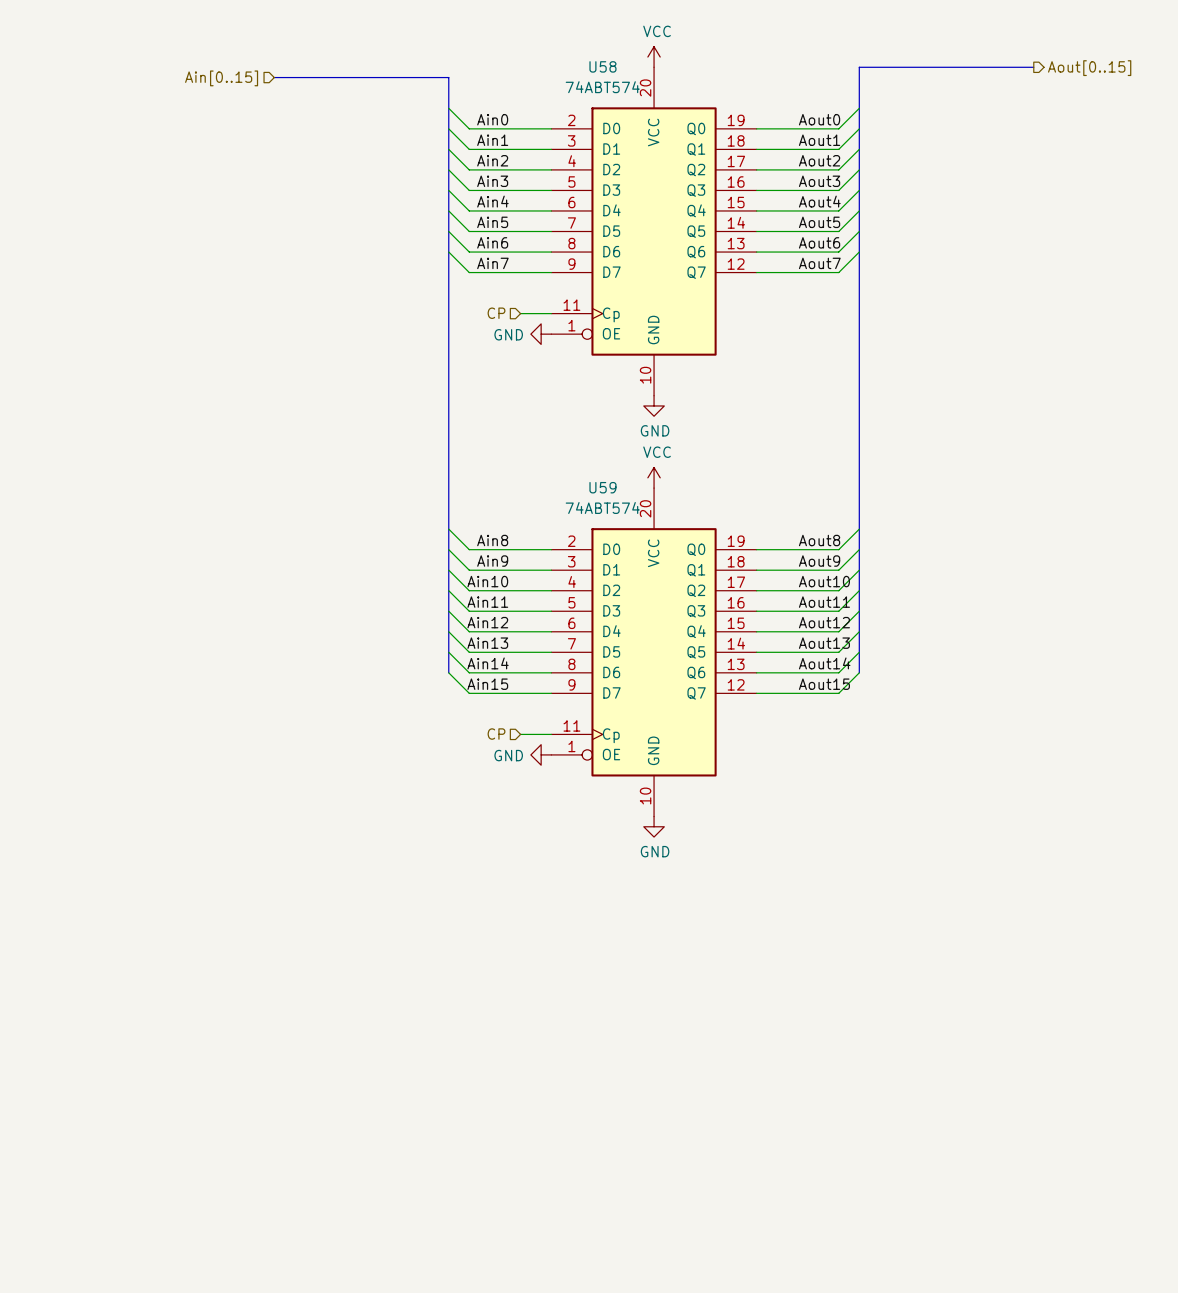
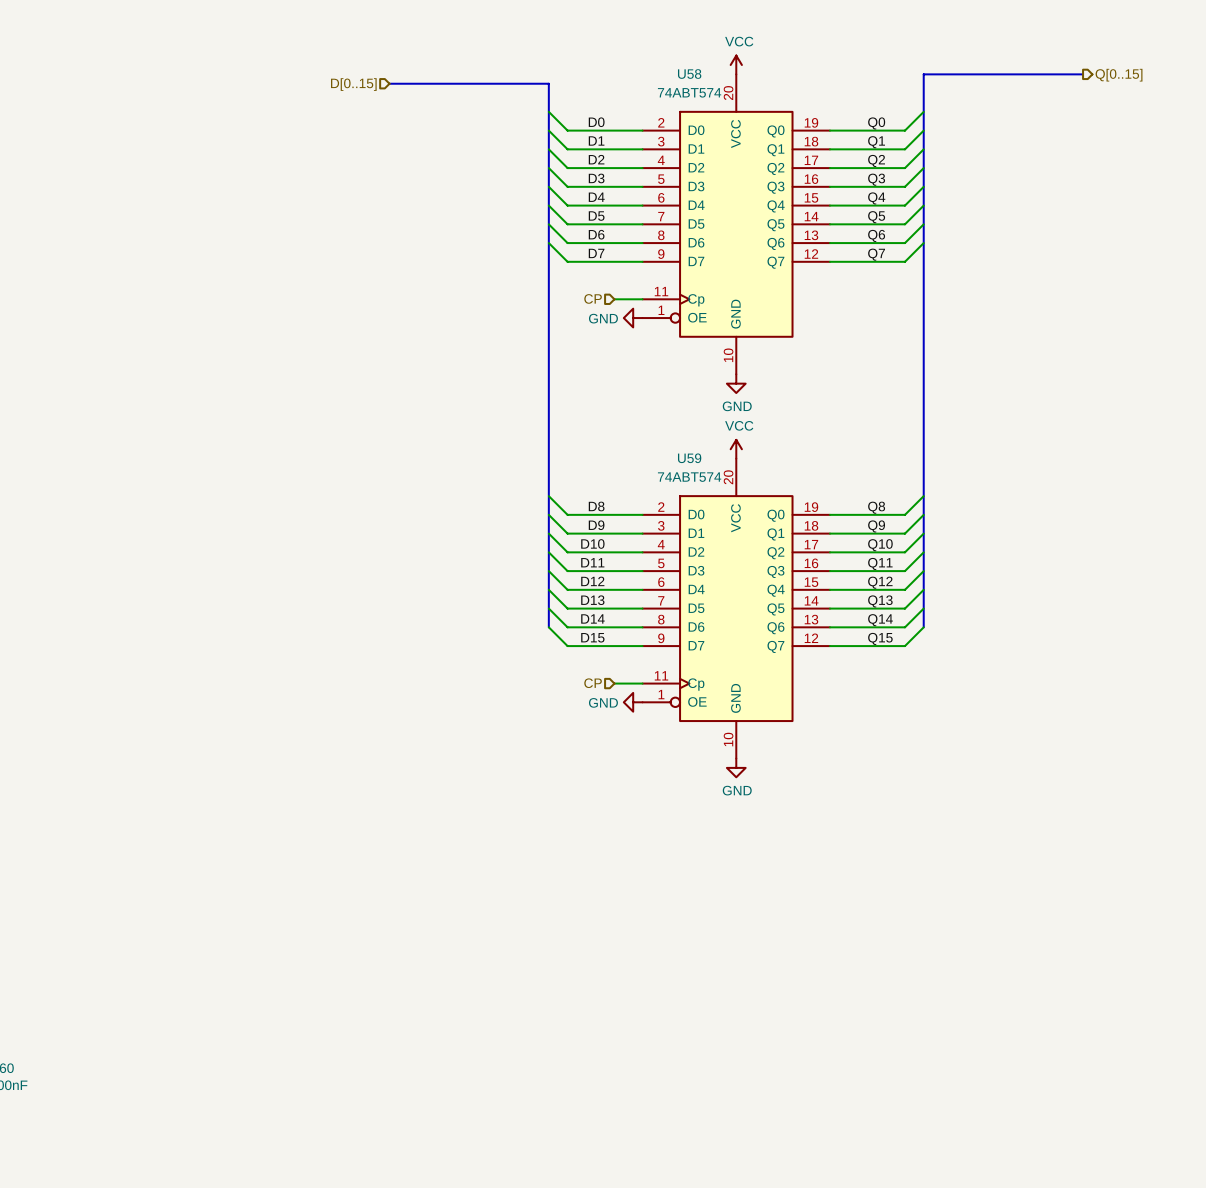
hierarchical label: Aout[0..15] (1089, 68) -> Q[0..15] (1119, 75)
hierarchical label: Ain[0..15] (221, 78) -> D[0..15] (353, 84)
label: Ain0 (492, 119) -> D0 (596, 122)
label: Aout0 (819, 119) -> Q0 (876, 123)
label: Ain1 (492, 140) -> D1 (596, 140)
label: Aout1 (819, 140) -> Q1 (876, 142)
label: Ain2 (492, 160) -> D2 (596, 159)
label: Aout2 (819, 160) -> Q2 (876, 160)
label: Ain3 (492, 181) -> D3 (596, 178)
label: Aout3 (819, 181) -> Q3 (876, 179)
label: Ain4 (492, 201) -> D4 (596, 197)
label: Aout4 (819, 201) -> Q4 (876, 198)
label: Ain5 (492, 222) -> D5 (596, 216)
label: Aout5 (819, 222) -> Q5 (876, 217)
label: Ain6 (492, 242) -> D6 (596, 234)
label: Aout6 (819, 242) -> Q6 (876, 235)
label: Ain7 (492, 263) -> D7 (596, 253)
label: Aout7 (819, 263) -> Q7 (876, 254)
label: Ain8 (492, 540) -> D8 (596, 506)
label: Aout8 (819, 540) -> Q8 (876, 507)
label: Ain9 (492, 561) -> D9 (596, 525)
label: Aout9 (819, 561) -> Q9 (876, 526)
label: Ain10 (487, 581) -> D10 (592, 543)
label: Aout10 (824, 581) -> Q10 (880, 545)
label: Ain11 (487, 602) -> D11 (592, 562)
label: Aout11 (824, 602) -> Q11 (880, 563)
label: Ain12 (487, 622) -> D12 (592, 581)
label: Aout12 (824, 622) -> Q12 (880, 582)
label: Ain13 (487, 643) -> D13 (592, 600)
label: Aout13 (824, 643) -> Q13 (880, 601)
label: Ain14 (488, 663) -> D14 (592, 618)
label: Aout14 (824, 663) -> Q14 (880, 620)
label: Ain15 (487, 684) -> D15 (592, 637)
label: Aout15 (824, 684) -> Q15 (880, 638)

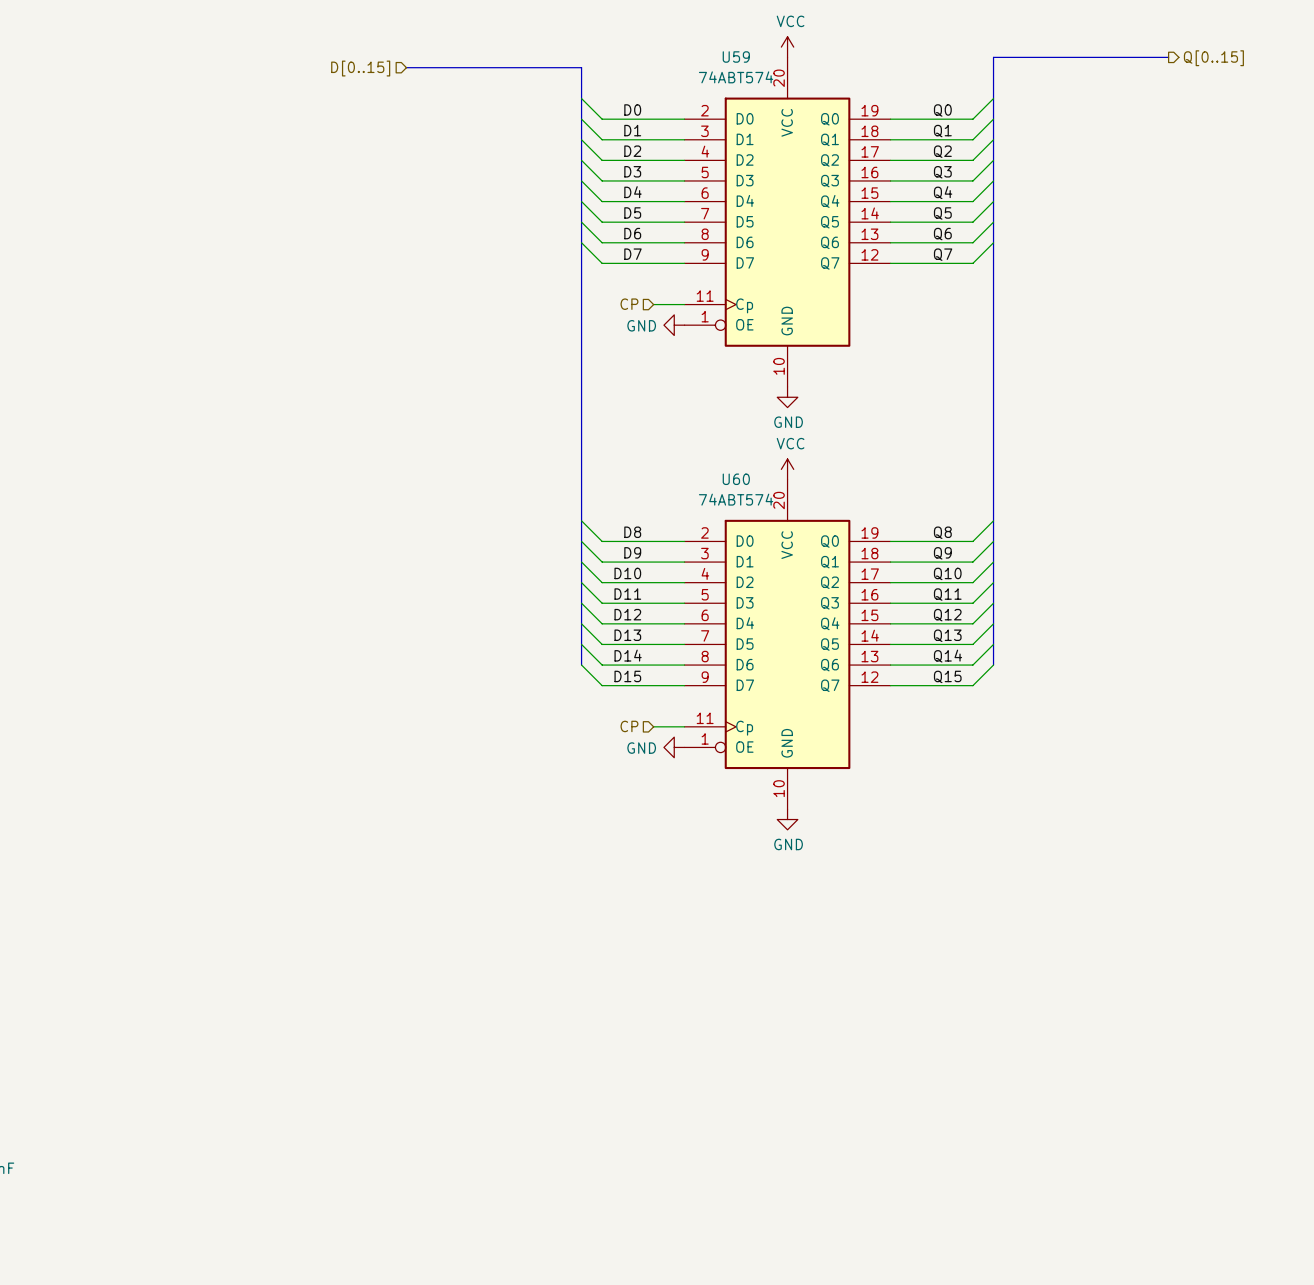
U58 name: U58 (689, 74) -> U59 (736, 57)
U59 name: U59 (689, 458) -> U60 (736, 479)

